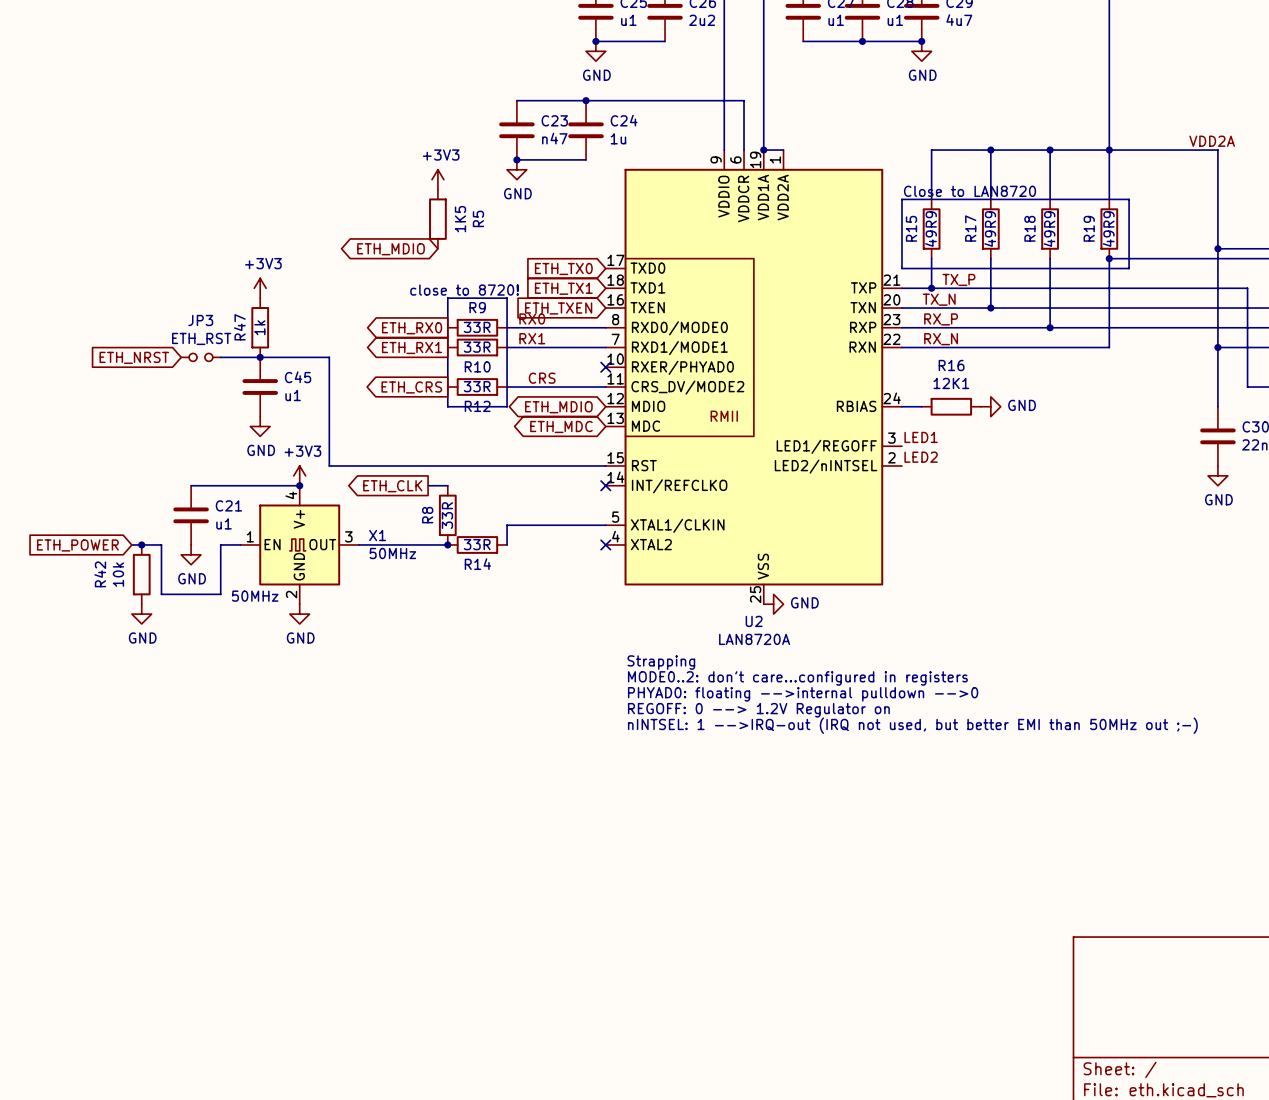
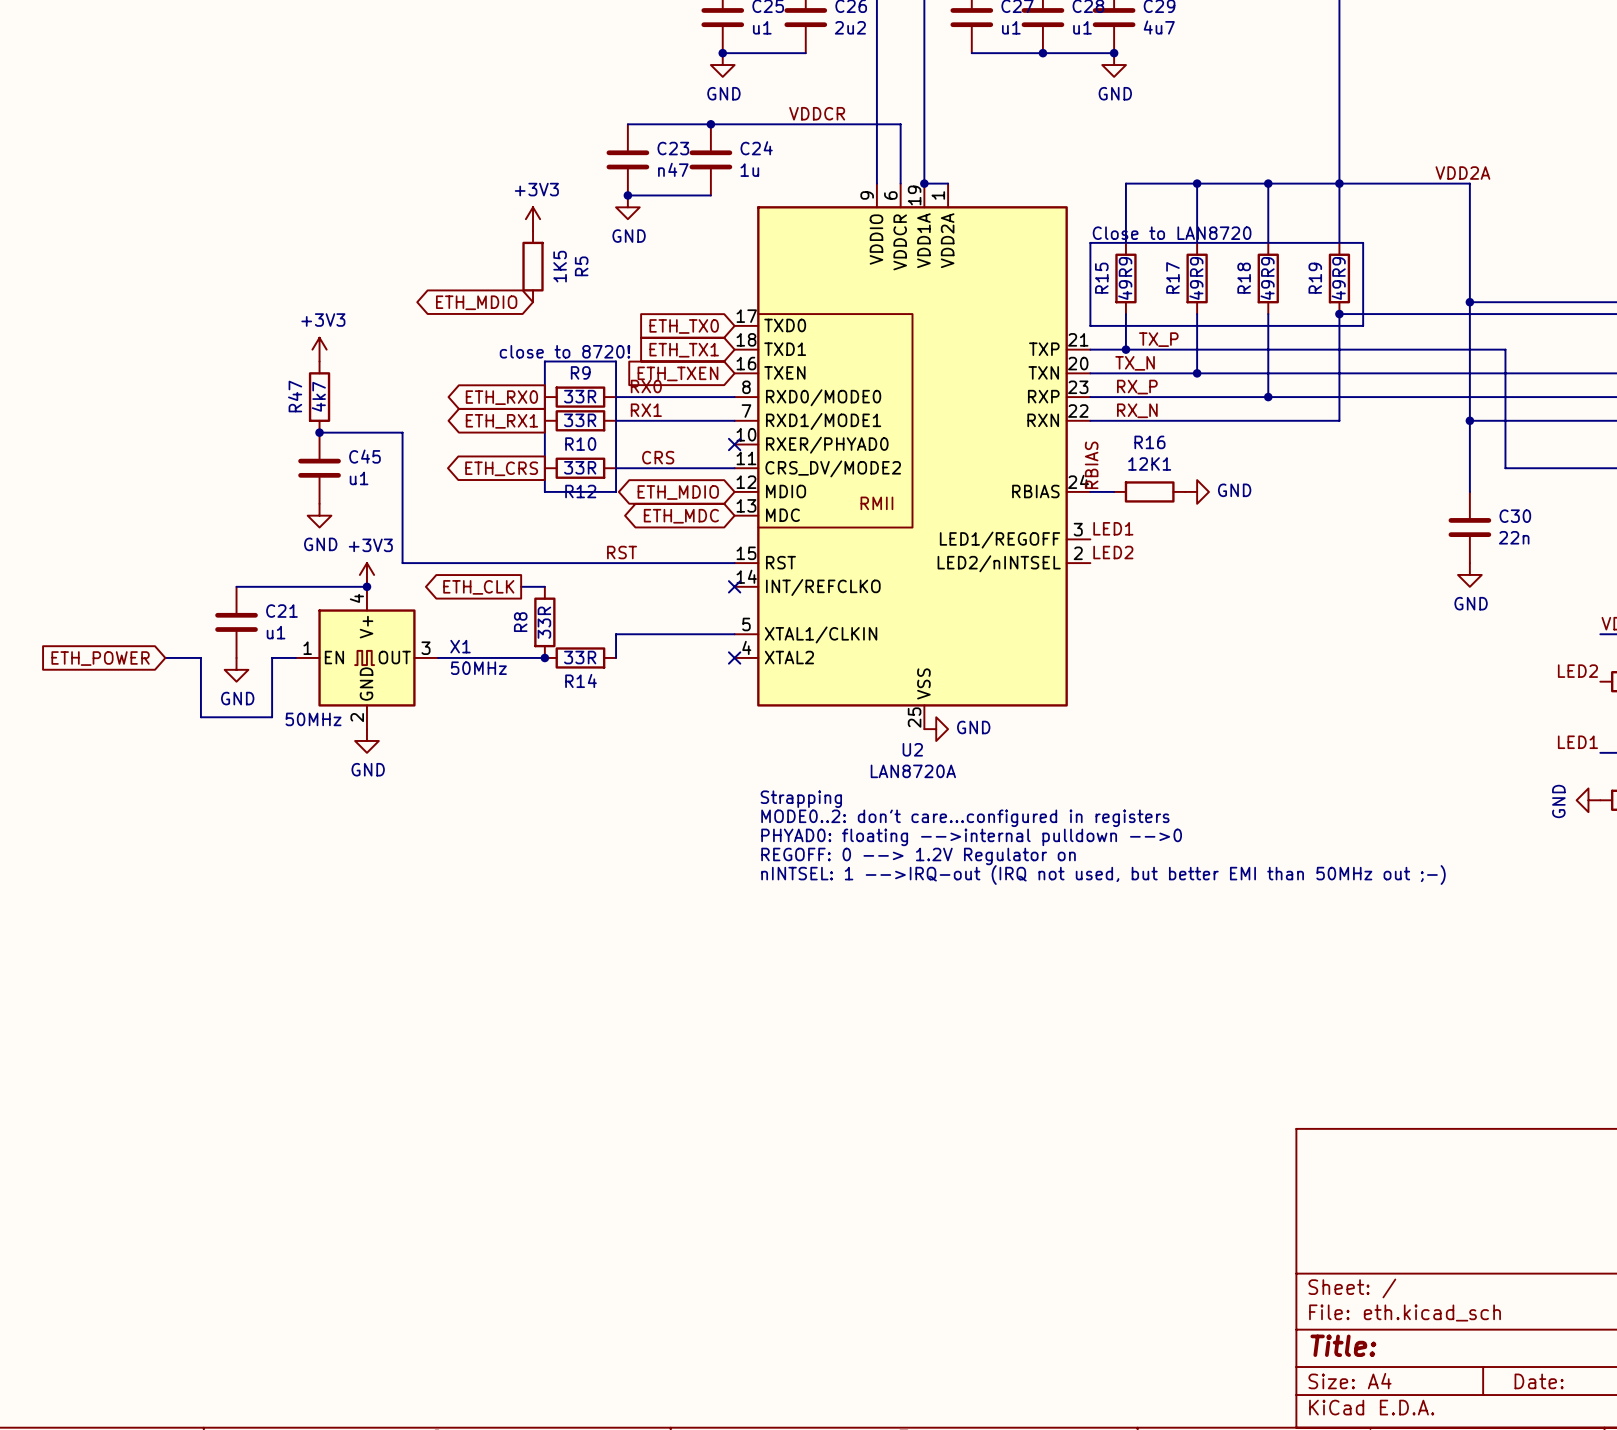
label: none -> VDDCR (817, 113)
R47 value: 1k (259, 327) -> 4k7 (318, 396)
global label: ETH_NRST (134, 357) -> none
JP3: ETH_RST (200, 357) -> none
wire: (220, 357) (260, 357) -> none
label: none -> RBIAS (1091, 465)
label: none -> RST (622, 552)
junction: (141, 544) -> none
R42: 10k (141, 574) -> none
power symbol: GND (141, 614) -> none

